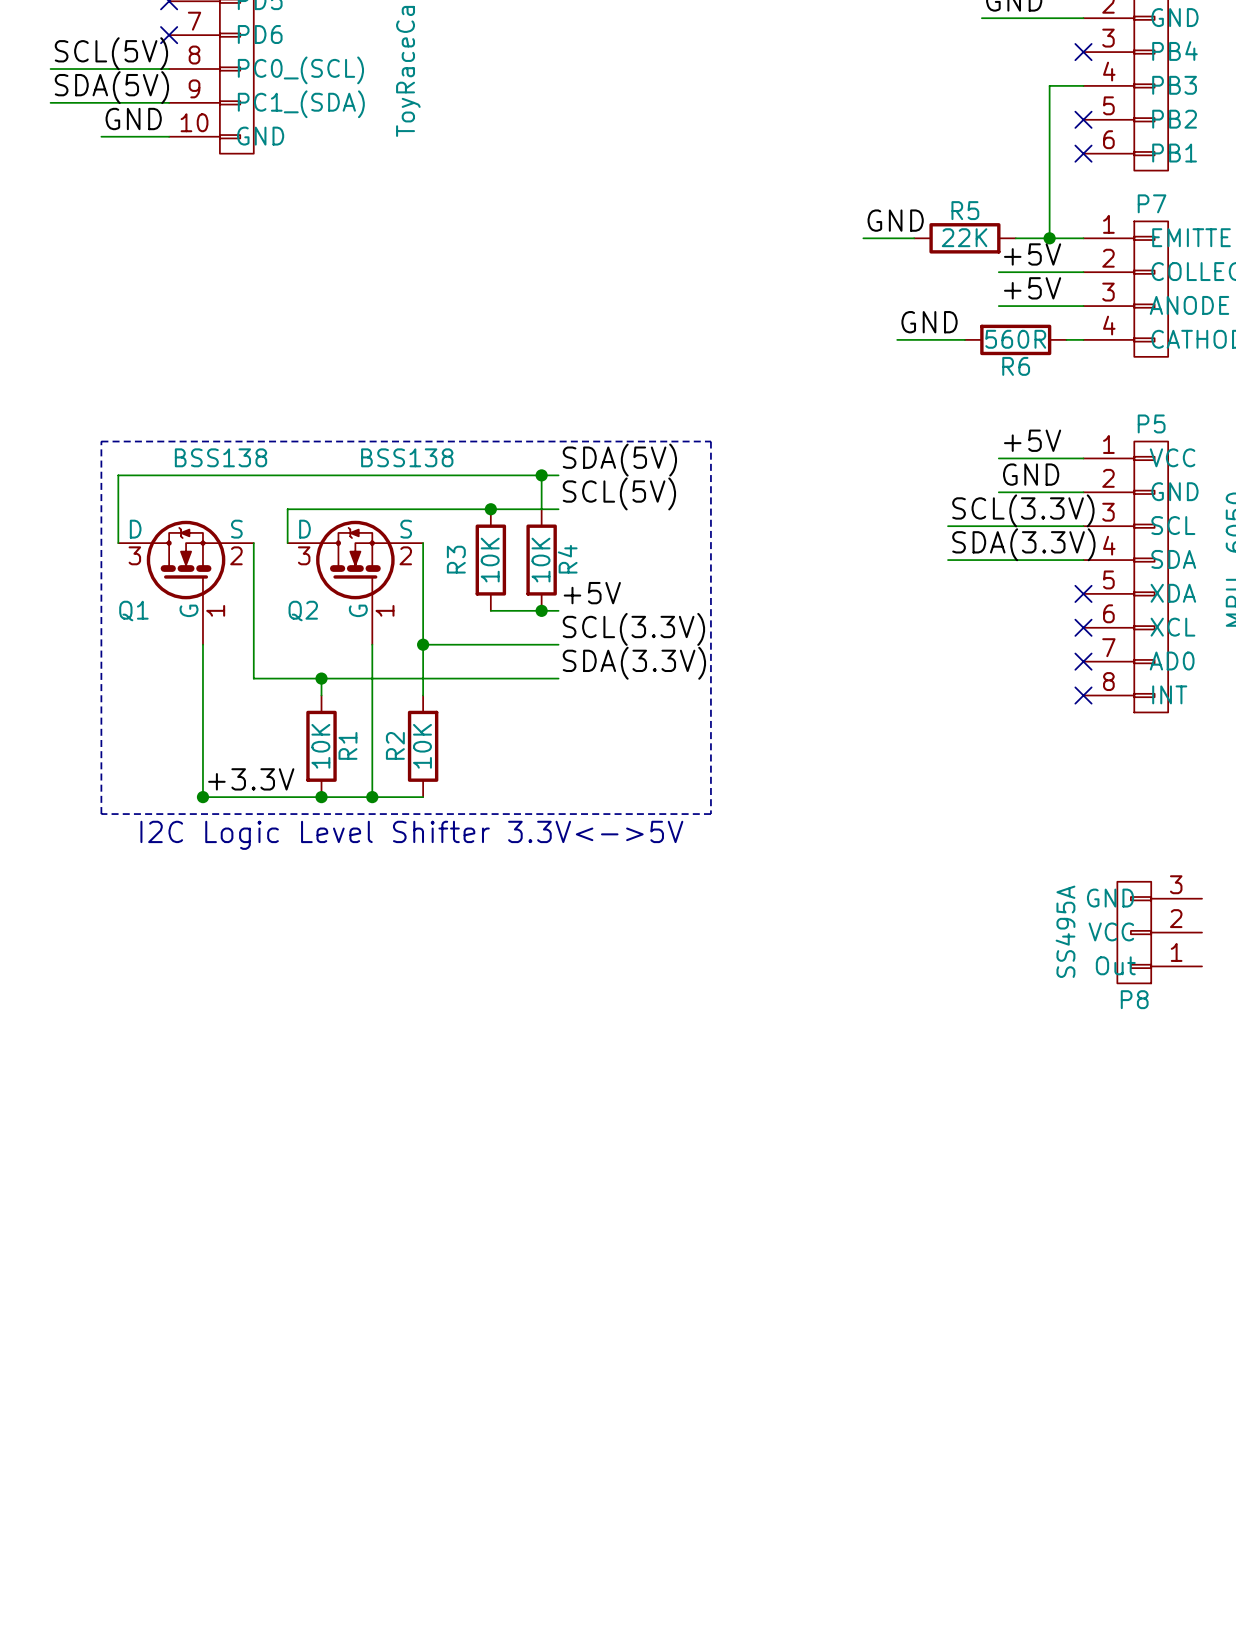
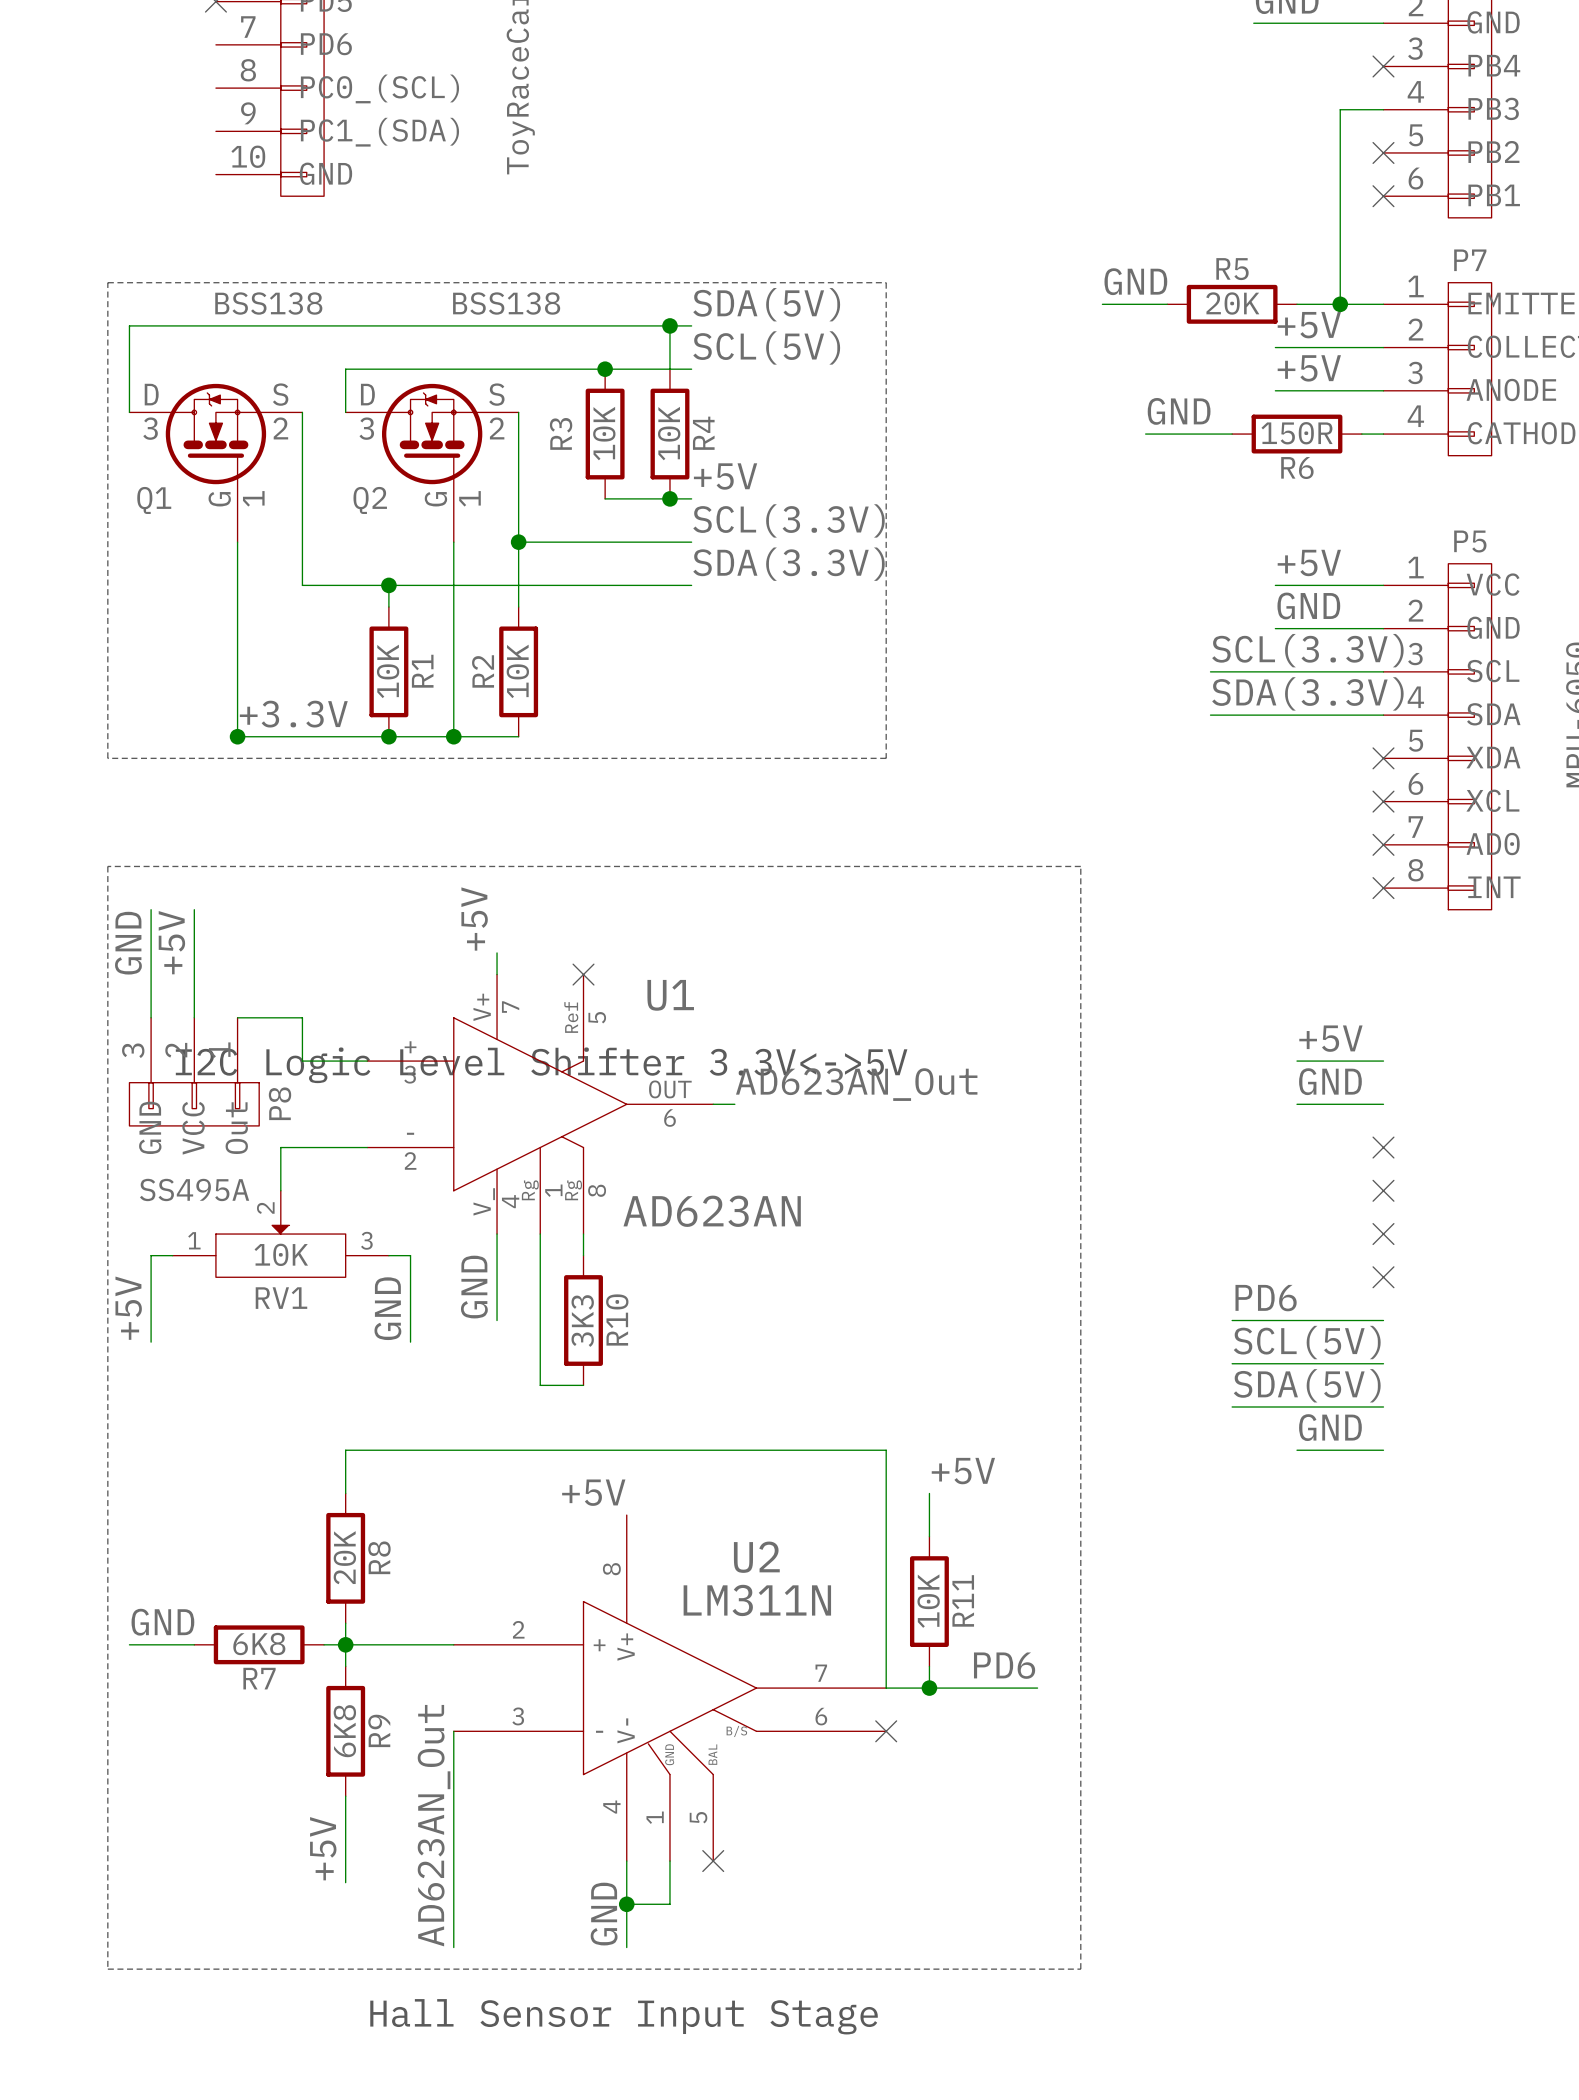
no-connect mark: (169, 35) -> none
label: SCL(5V) (111, 53) -> none
wire: (50, 69) (169, 69) -> none
label: SDA(5V) (111, 87) -> none
wire: (50, 102) (169, 102) -> none
label: GND (133, 119) -> none
wire: (101, 136) (169, 136) -> none
R5 value: 22K (964, 237) -> 20K (1232, 303)
junction: none -> (669, 325)
junction: none -> (605, 369)
R6 value: 560R (1015, 339) -> 150R (1297, 433)
label: none -> +5V (725, 476)
junction: none -> (669, 498)
wire: none -> (237, 542) (237, 736) (518, 736)
junction: none -> (518, 542)
line: (101, 441) (710, 441) (710, 814) (101, 814) (101, 441) -> (107, 282) (886, 282) (886, 758) (107, 758) (107, 282)
junction: none -> (388, 585)
label position: SDA(5V) (619, 460) -> SDA(5V) (766, 304)
wire: (541, 475) (541, 509) -> (669, 325) (669, 369)
junction: (541, 475) -> none
wire: (558, 475) (118, 475) (118, 543) -> (691, 325) (129, 325) (129, 412)
label position: SCL(5V) (619, 493) -> SCL(5V) (766, 347)
junction: (490, 509) -> none
wire: (558, 509) (287, 509) (287, 543) -> (691, 369) (345, 369) (345, 412)
wire: (253, 543) (253, 678) (558, 678) -> (302, 412) (302, 585) (691, 585)
wire: (423, 543) (423, 695) -> (518, 412) (518, 607)
R3 position: (490, 560) -> (605, 434)
R4 position: (541, 560) -> (669, 434)
junction: none -> (237, 736)
junction: none -> (388, 736)
junction: none -> (453, 736)
Q1 position: (186, 582) -> (215, 463)
Q2 position: (355, 582) -> (432, 463)
label: +5V (592, 593) -> none
wire: (490, 610) (558, 610) -> (605, 498) (691, 498)
junction: (541, 610) -> none
label position: SCL(3.3V) (633, 629) -> SCL(3.3V) (789, 520)
wire: (202, 644) (202, 797) -> (237, 1017) (259, 1017)
wire: (372, 644) (372, 797) -> (453, 542) (453, 736)
wire: (423, 644) (558, 644) -> (518, 542) (691, 542)
junction: (423, 644) -> none
label position: SDA(3.3V) (634, 663) -> SDA(3.3V) (789, 564)
line: none -> (107, 866) (107, 1969) (1080, 1969) (1080, 866) (107, 866)
wire: (321, 678) (321, 695) -> (388, 585) (388, 607)
junction: (321, 678) -> none
wire: none -> (151, 909) (151, 1017)
wire: none -> (194, 909) (194, 1017)
label: none -> +5V (474, 919)
label: none -> +5V (171, 942)
label: none -> GND (128, 943)
R1 position: (321, 746) -> (388, 671)
wire: none -> (497, 952) (497, 974)
R2 position: (423, 746) -> (518, 671)
no-connect mark: none -> (583, 974)
label position: +3.3V (251, 779) -> +3.3V (293, 714)
junction: (202, 797) -> none
wire: (236, 797) (423, 797) -> (302, 1017) (302, 1061) (367, 1061)
junction: (321, 797) -> none
junction: (372, 797) -> none
label: none -> +5V (1330, 1038)
wire: none -> (1297, 1061) (1383, 1061)
label: none -> GND (1330, 1081)
label: none -> AD623AN_Out (856, 1084)
U1: none -> AD623AN (540, 1104)
wire: none -> (713, 1104) (734, 1104)
wire: none -> (1297, 1104) (1383, 1104)
wire: none -> (367, 1147) (280, 1147) (280, 1190)
no-connect mark: none -> (1383, 1147)
no-connect mark: none -> (1383, 1190)
P8 rotation: 0° (1134, 932) -> 90° counterclockwise (194, 1104)
P8 position: (1159, 932) -> (194, 1071)
RV1: none -> 10K (280, 1234)
wire: none -> (497, 1234) (497, 1320)
wire: none -> (540, 1234) (540, 1385) (583, 1385)
wire: none -> (583, 1234) (583, 1255)
no-connect mark: none -> (1383, 1234)
wire: none -> (172, 1255) (151, 1255) (151, 1342)
wire: none -> (388, 1255) (410, 1255) (410, 1342)
no-connect mark: none -> (1383, 1277)
label: none -> GND (474, 1287)
label: none -> PD6 (1266, 1298)
label: none -> +5V (128, 1308)
label: none -> GND (387, 1308)
R10: none -> 3K3 (583, 1320)
wire: none -> (1232, 1320) (1383, 1320)
label: none -> SCL(5V) (1307, 1342)
wire: none -> (1232, 1363) (1383, 1363)
label: none -> SDA(5V) (1307, 1385)
wire: none -> (1232, 1406) (1383, 1406)
label: none -> GND (1330, 1427)
wire: none -> (1297, 1450) (1383, 1450)
label: none -> +5V (963, 1471)
label: none -> +5V (593, 1492)
wire: none -> (345, 1493) (345, 1450) (886, 1450) (886, 1688) (1037, 1688)
wire: none -> (929, 1493) (929, 1536)
R8: none -> 20K (345, 1558)
R11: none -> 10K (929, 1601)
label: none -> GND (162, 1622)
wire: none -> (345, 1623) (345, 1666)
wire: none -> (129, 1644) (194, 1644)
R7: none -> 6K8 (259, 1644)
wire: none -> (324, 1644) (453, 1644)
junction: none -> (345, 1644)
label: none -> PD6 (1004, 1665)
wire: none -> (929, 1666) (929, 1688)
U2: none -> LM311N (669, 1688)
junction: none -> (929, 1688)
R9: none -> 6K8 (345, 1731)
wire: none -> (453, 1731) (453, 1947)
no-connect mark: none -> (886, 1731)
wire: none -> (345, 1796) (345, 1882)
label: none -> AD623AN_Out (434, 1825)
label: none -> +5V (323, 1848)
wire: none -> (626, 1861) (626, 1947)
wire: none -> (669, 1861) (669, 1904) (626, 1904)
no-connect mark: none -> (713, 1861)
junction: none -> (626, 1904)
label: none -> GND (604, 1914)
text: none -> Hall Sensor Input Stage (624, 2016)

